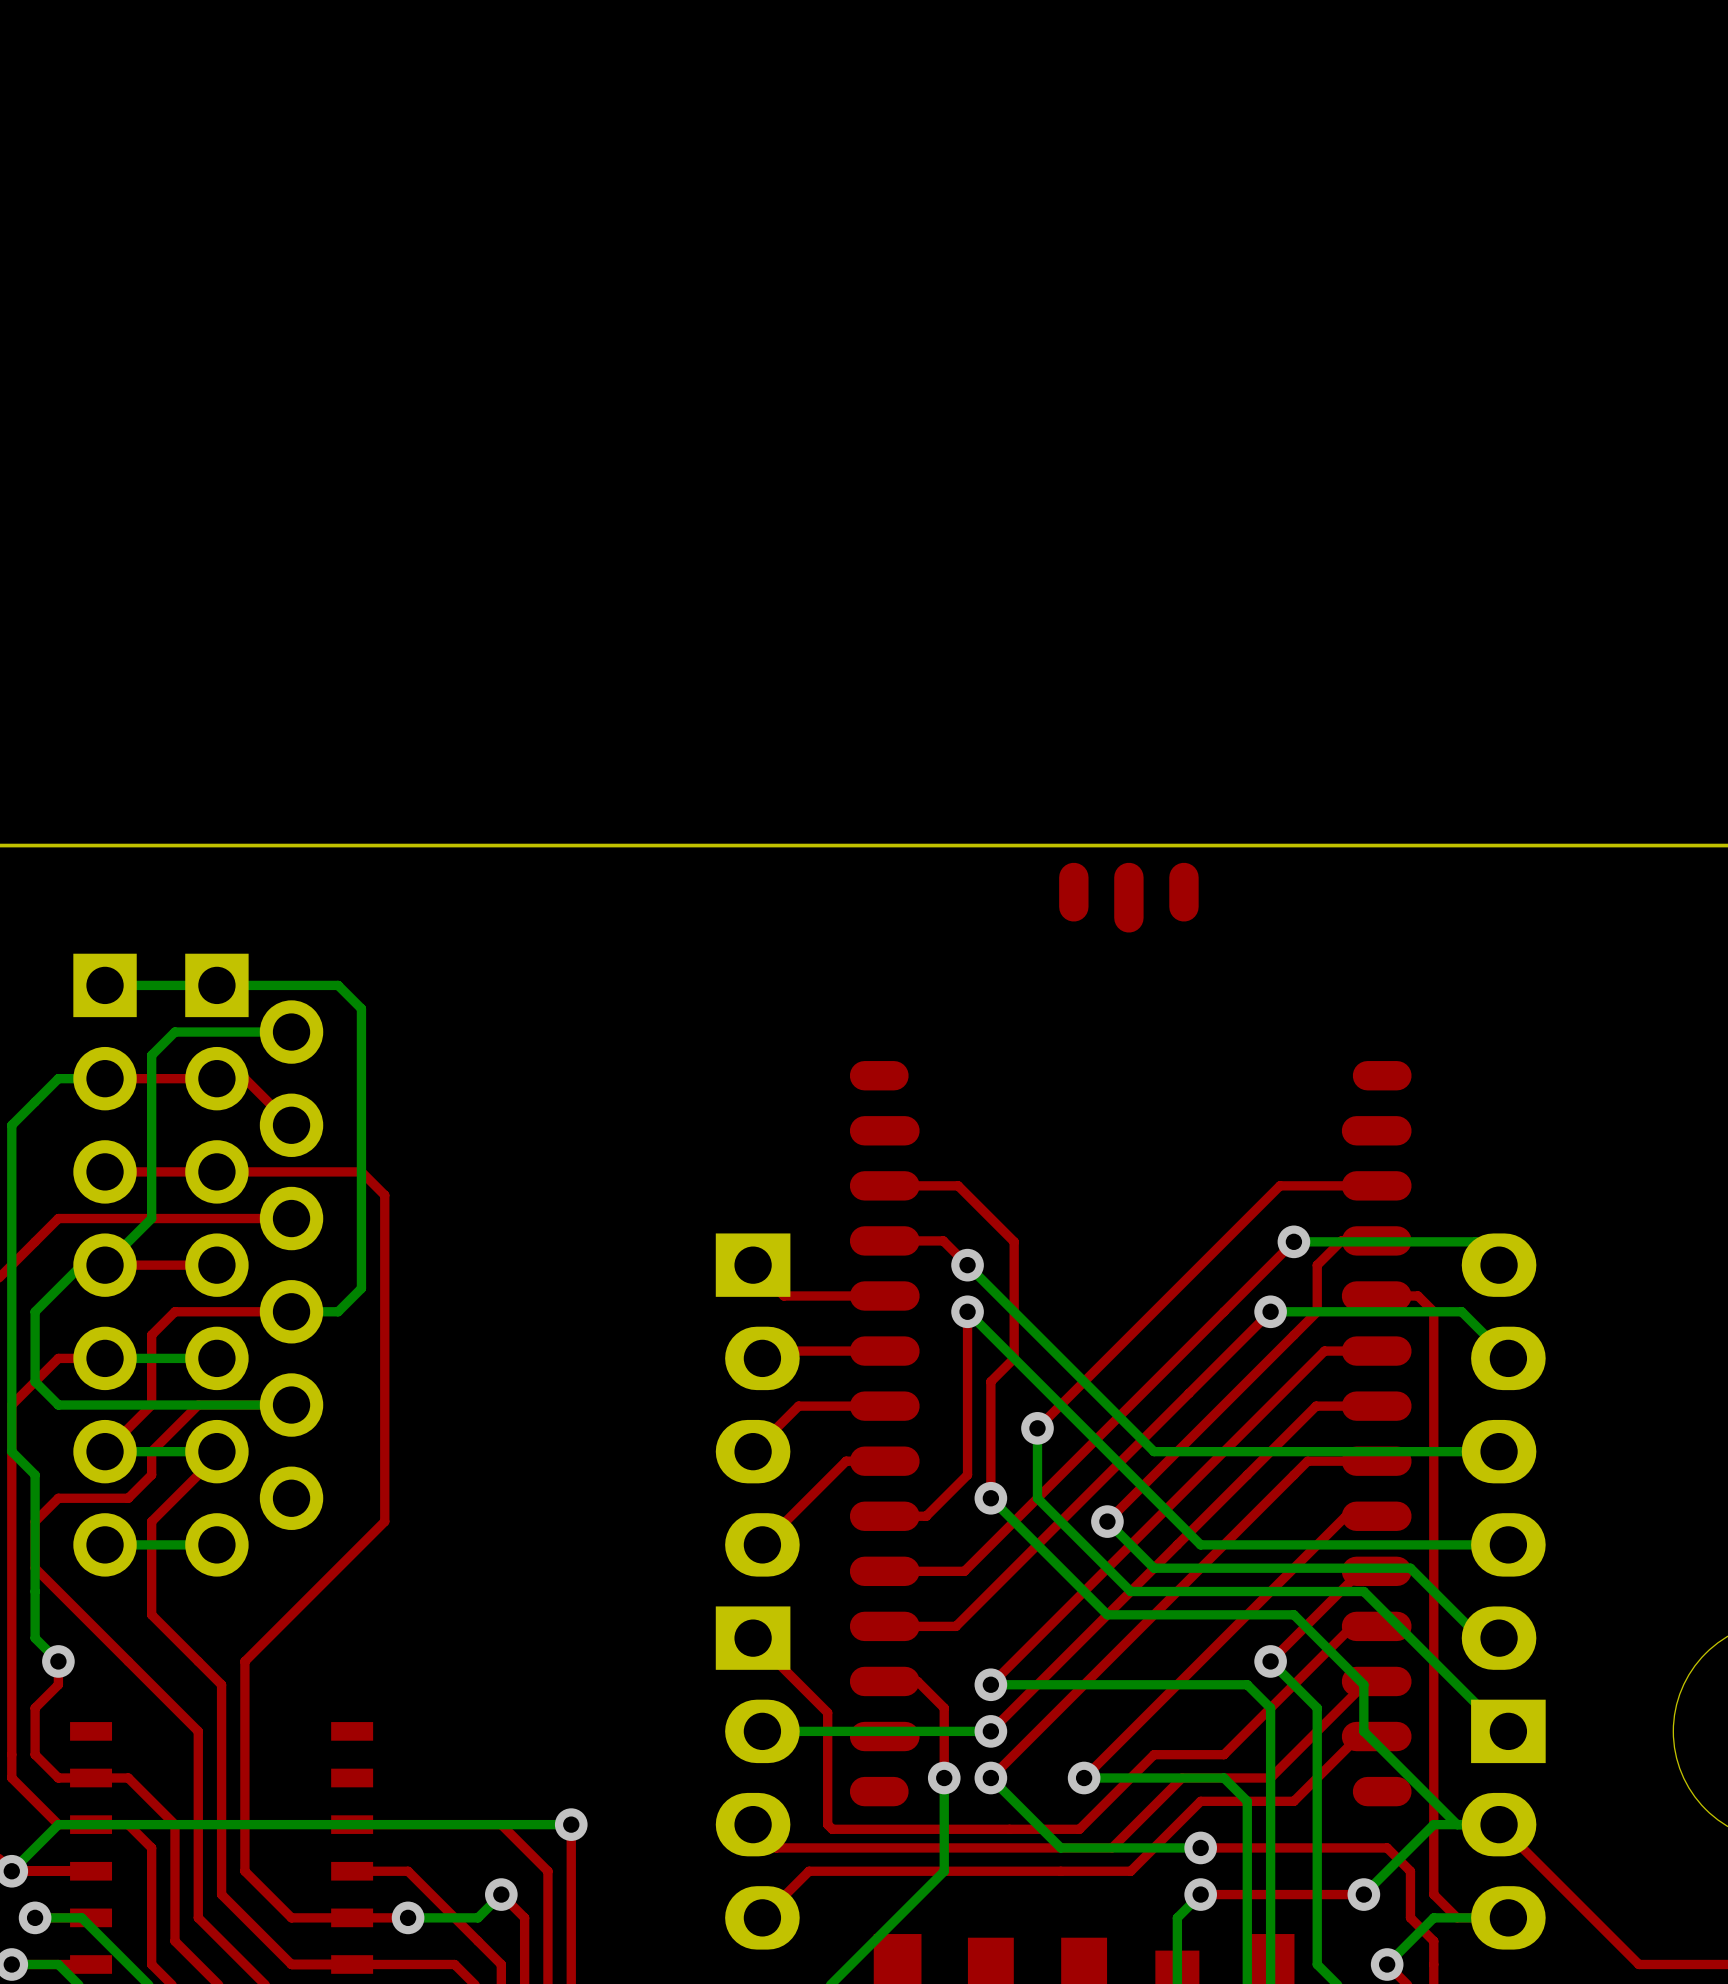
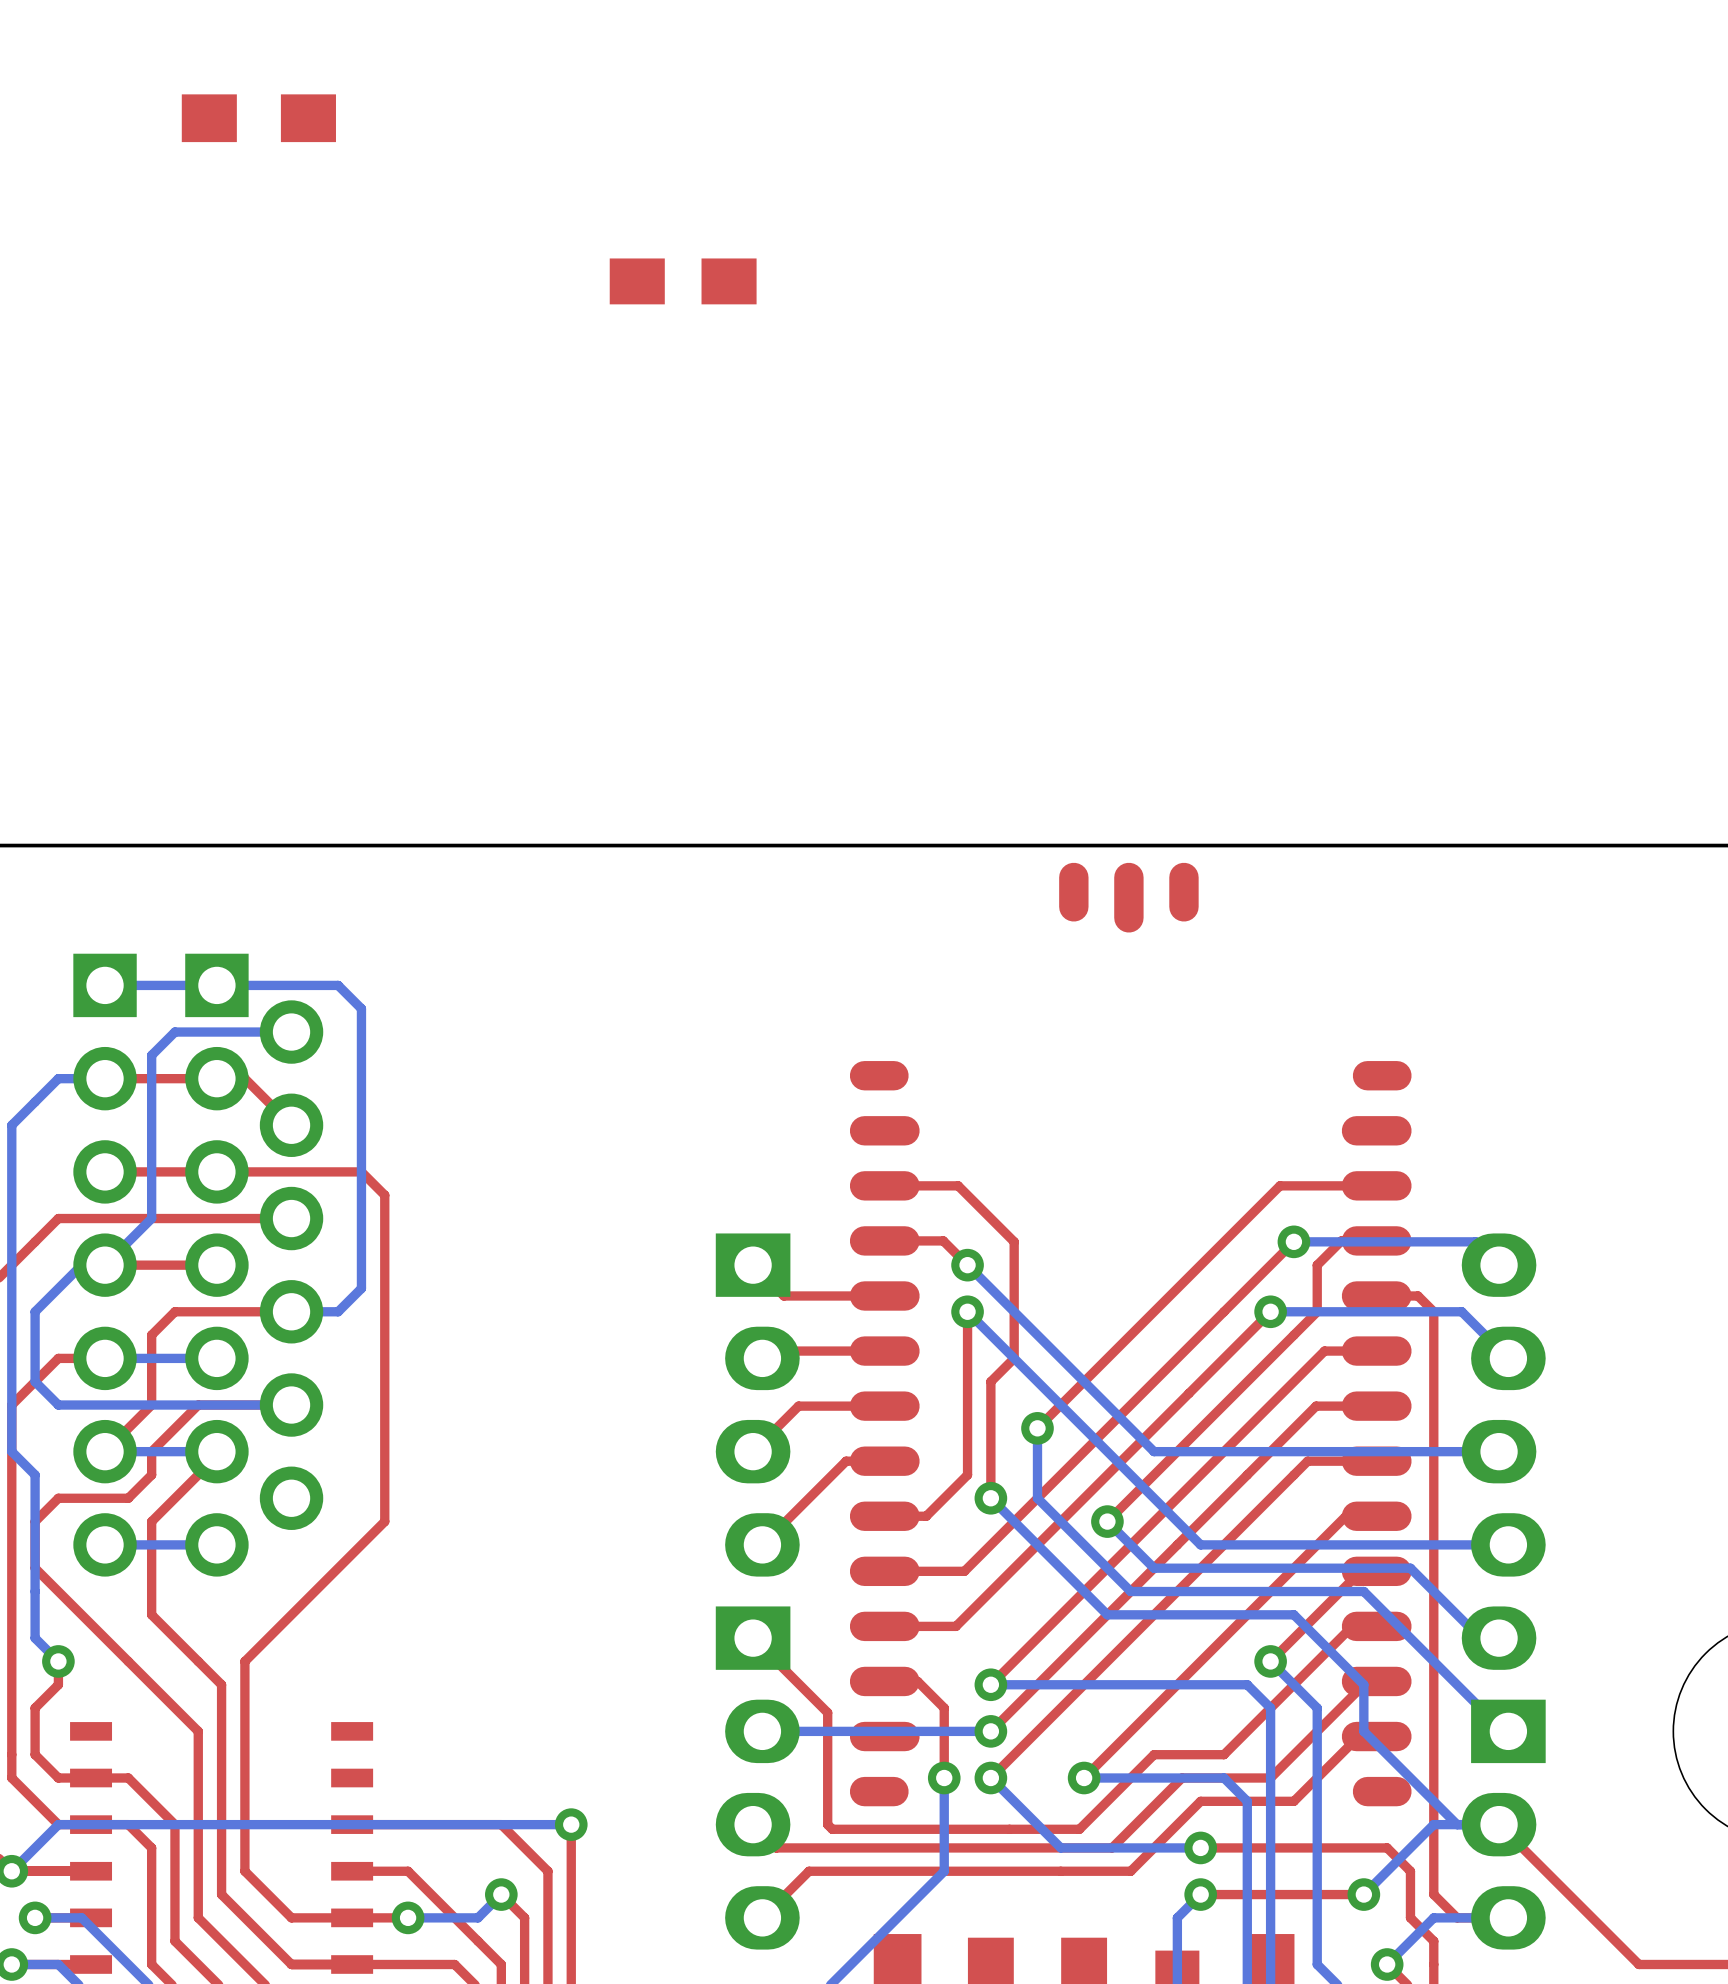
part: none -> (258, 118)
part: none -> (683, 281)

